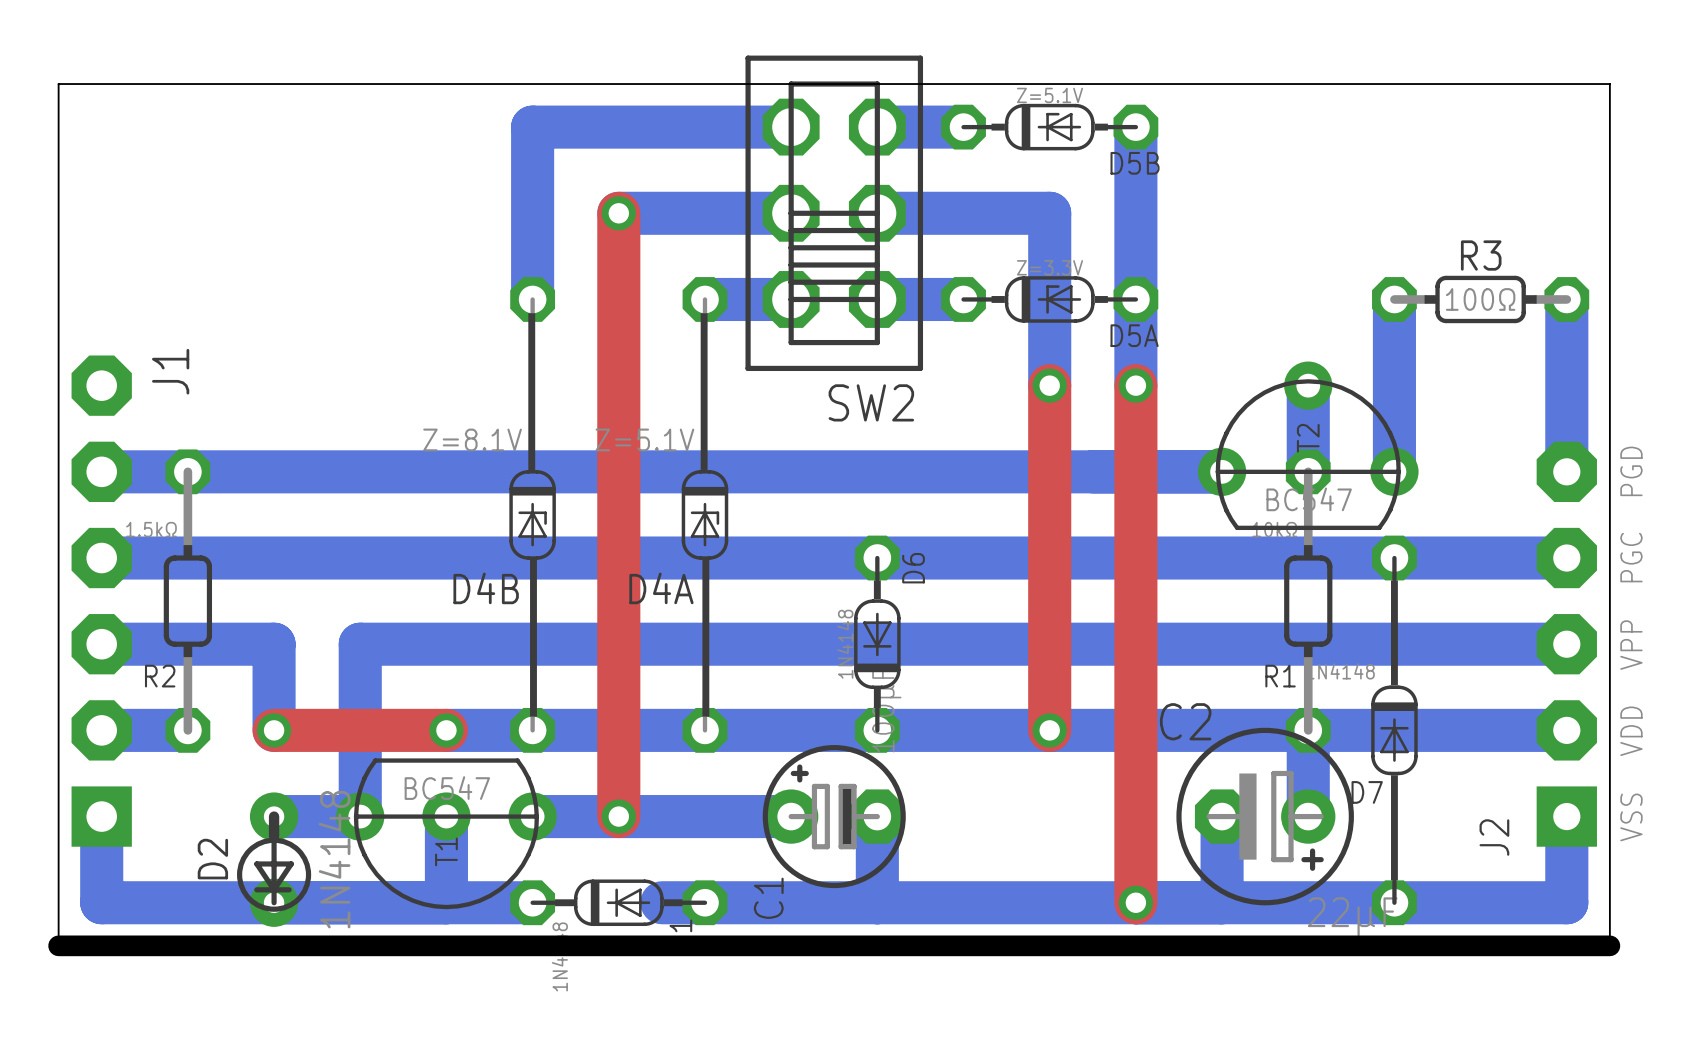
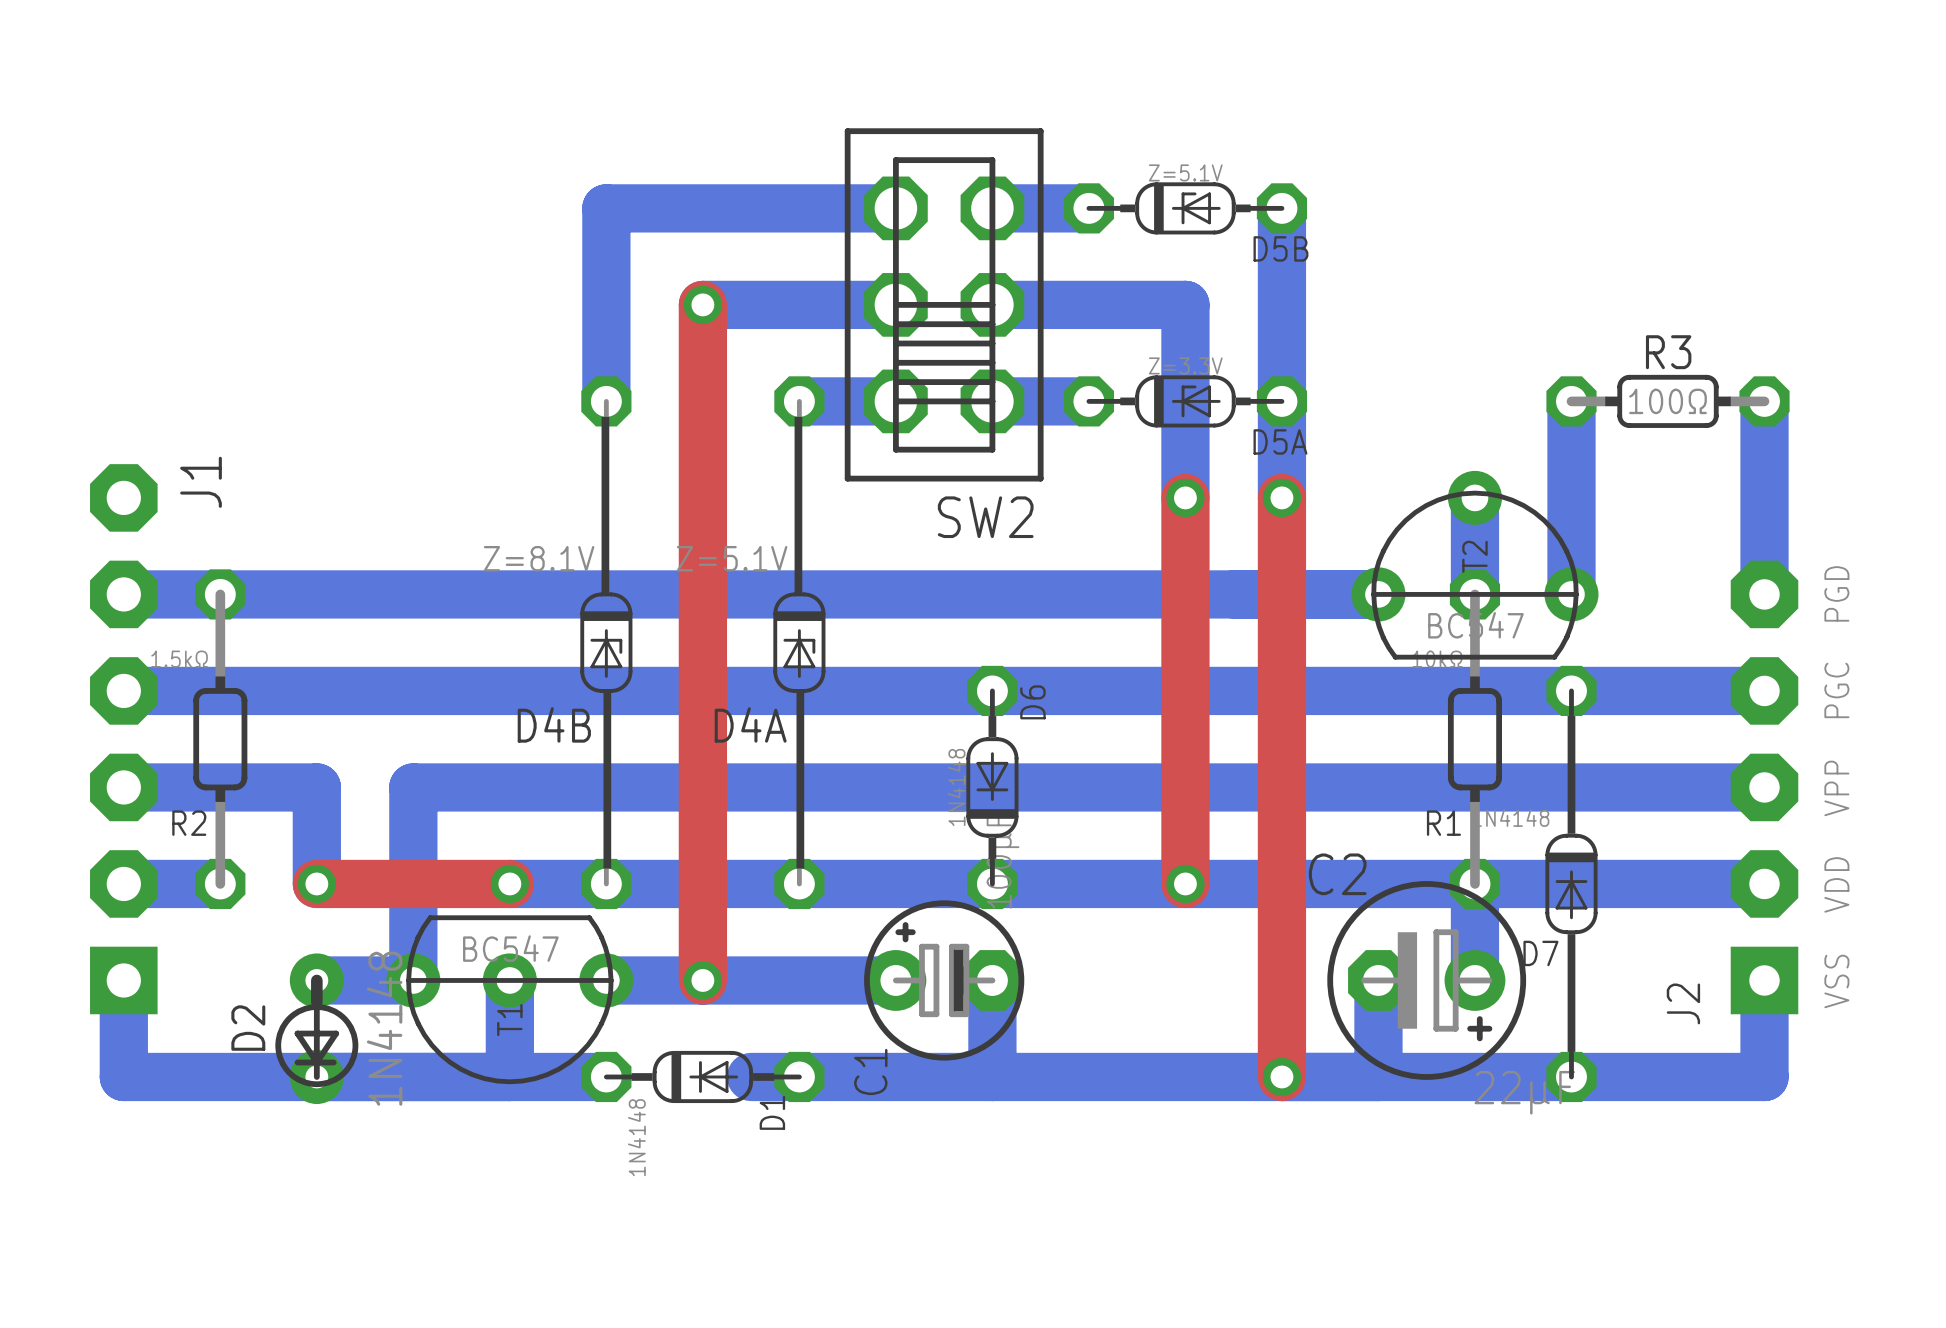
board edge: (58, 84) (1609, 84) (1609, 945) (58, 945) (58, 84) -> none

